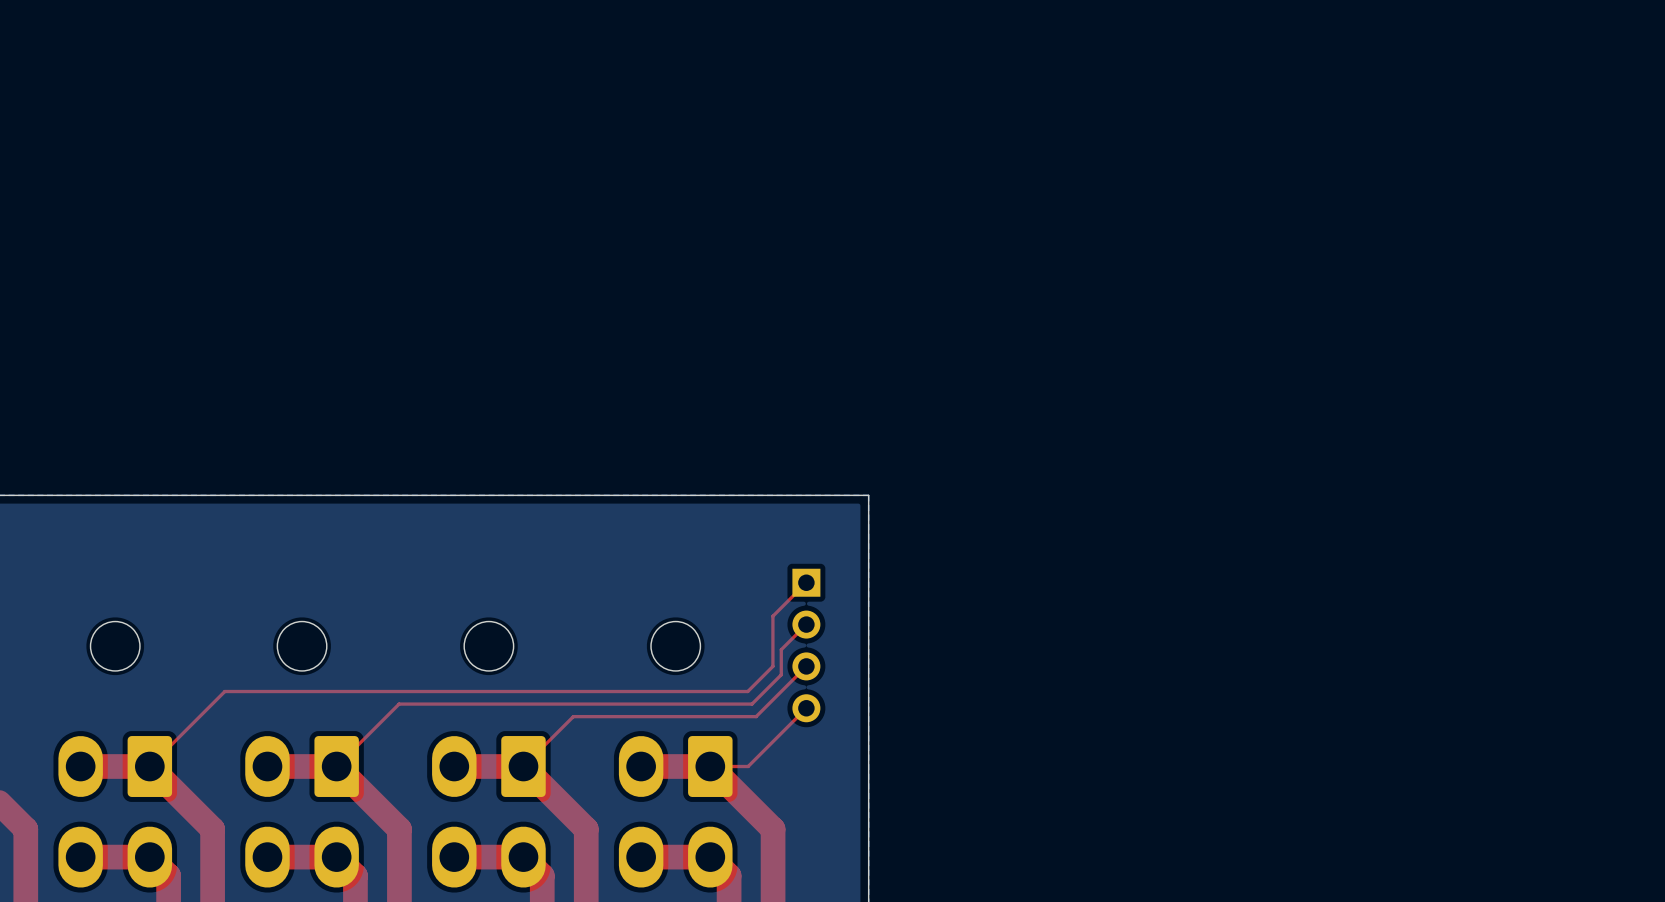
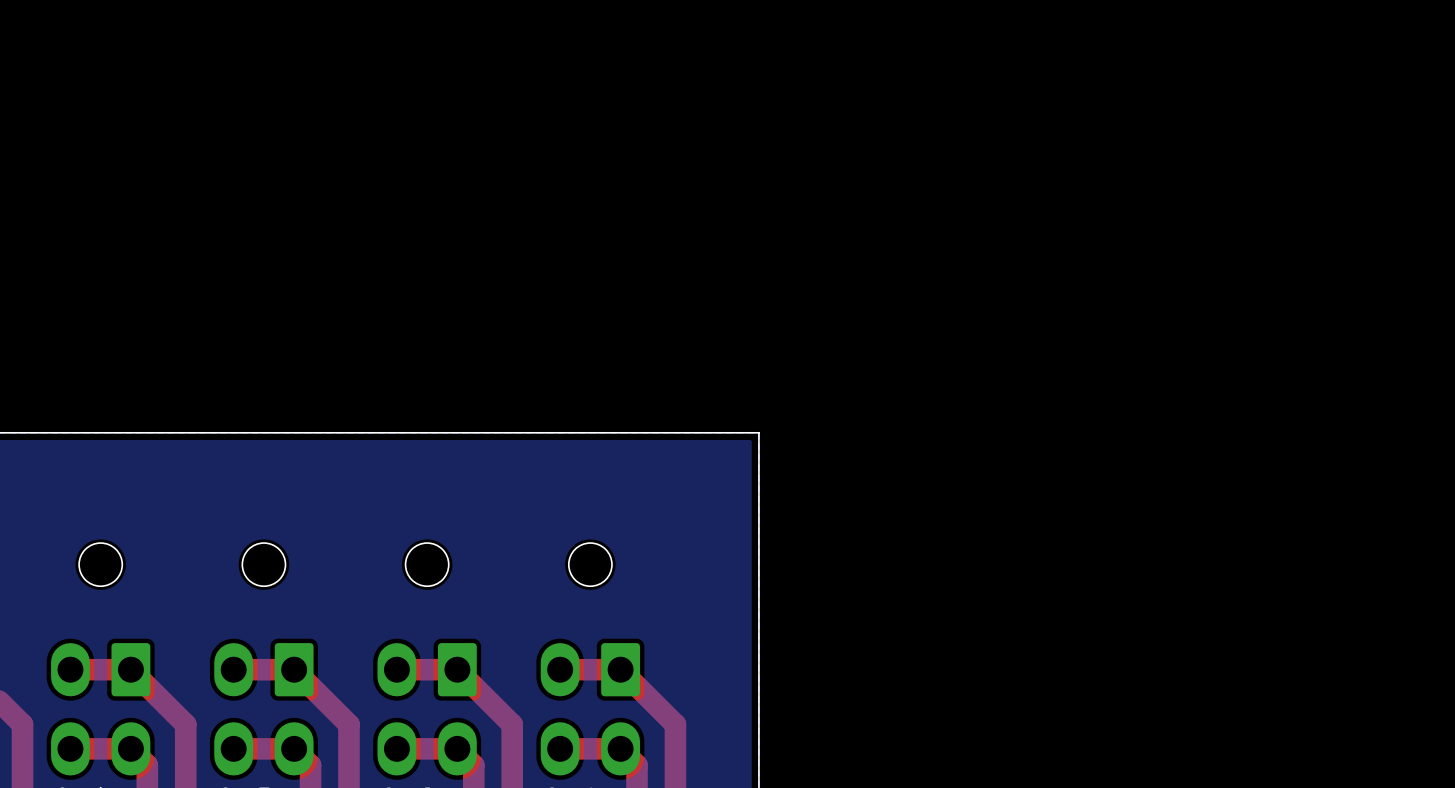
top track: (806, 582) (772, 616) (772, 666) (747, 691) (224, 691) (149, 766) -> none
top track: (806, 624) (781, 649) (781, 674) (752, 704) (399, 704) (336, 766) -> none
part: (806, 645) -> none
top track: (806, 666) (756, 716) (573, 716) (523, 766) -> none
top track: (806, 708) (748, 766) (710, 766) -> none

